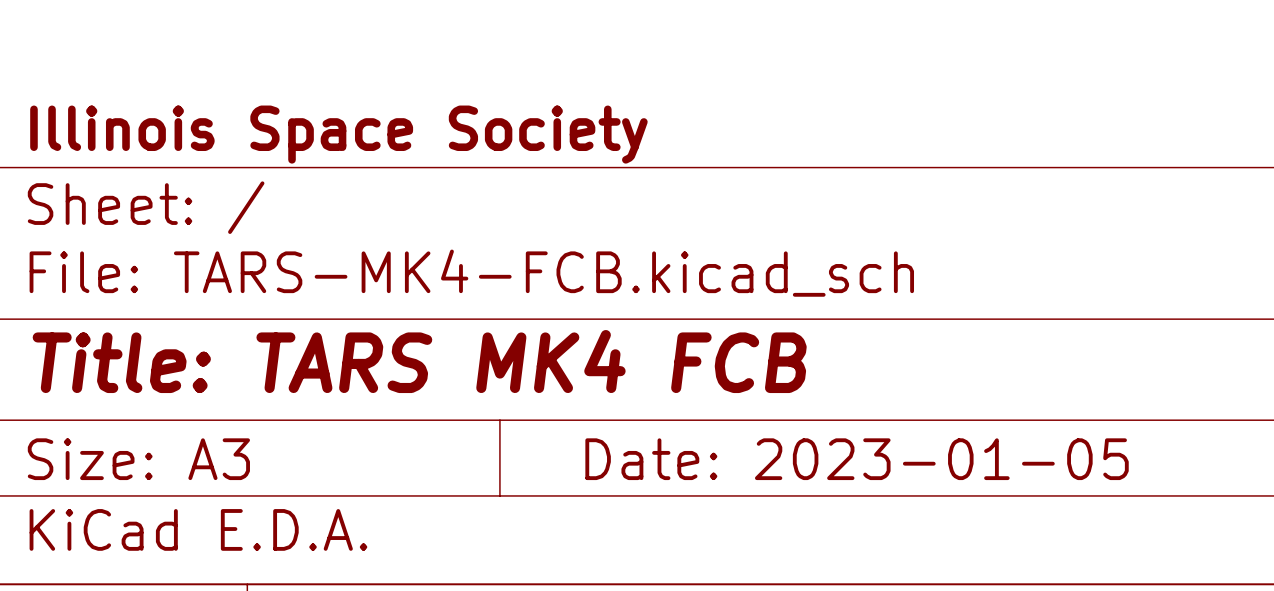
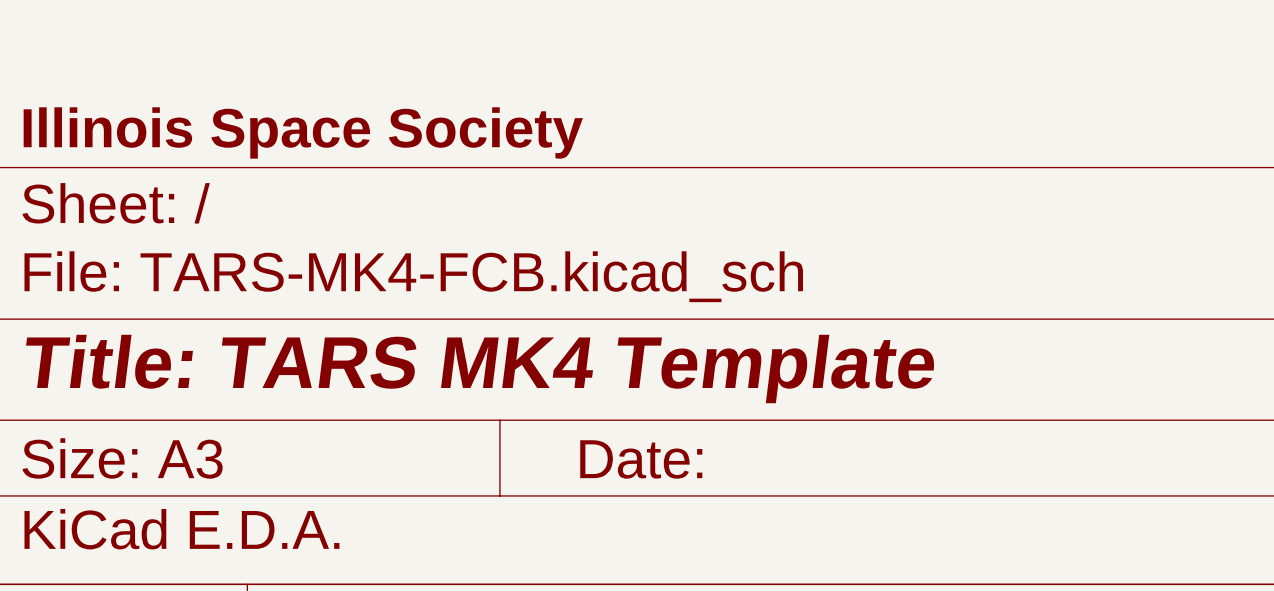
title block: Title: TARS MK4 FCB (419, 361) -> Title: TARS MK4 Template (480, 369)
title block: Date: 2023-01-05 (857, 459) -> Date: (641, 459)

